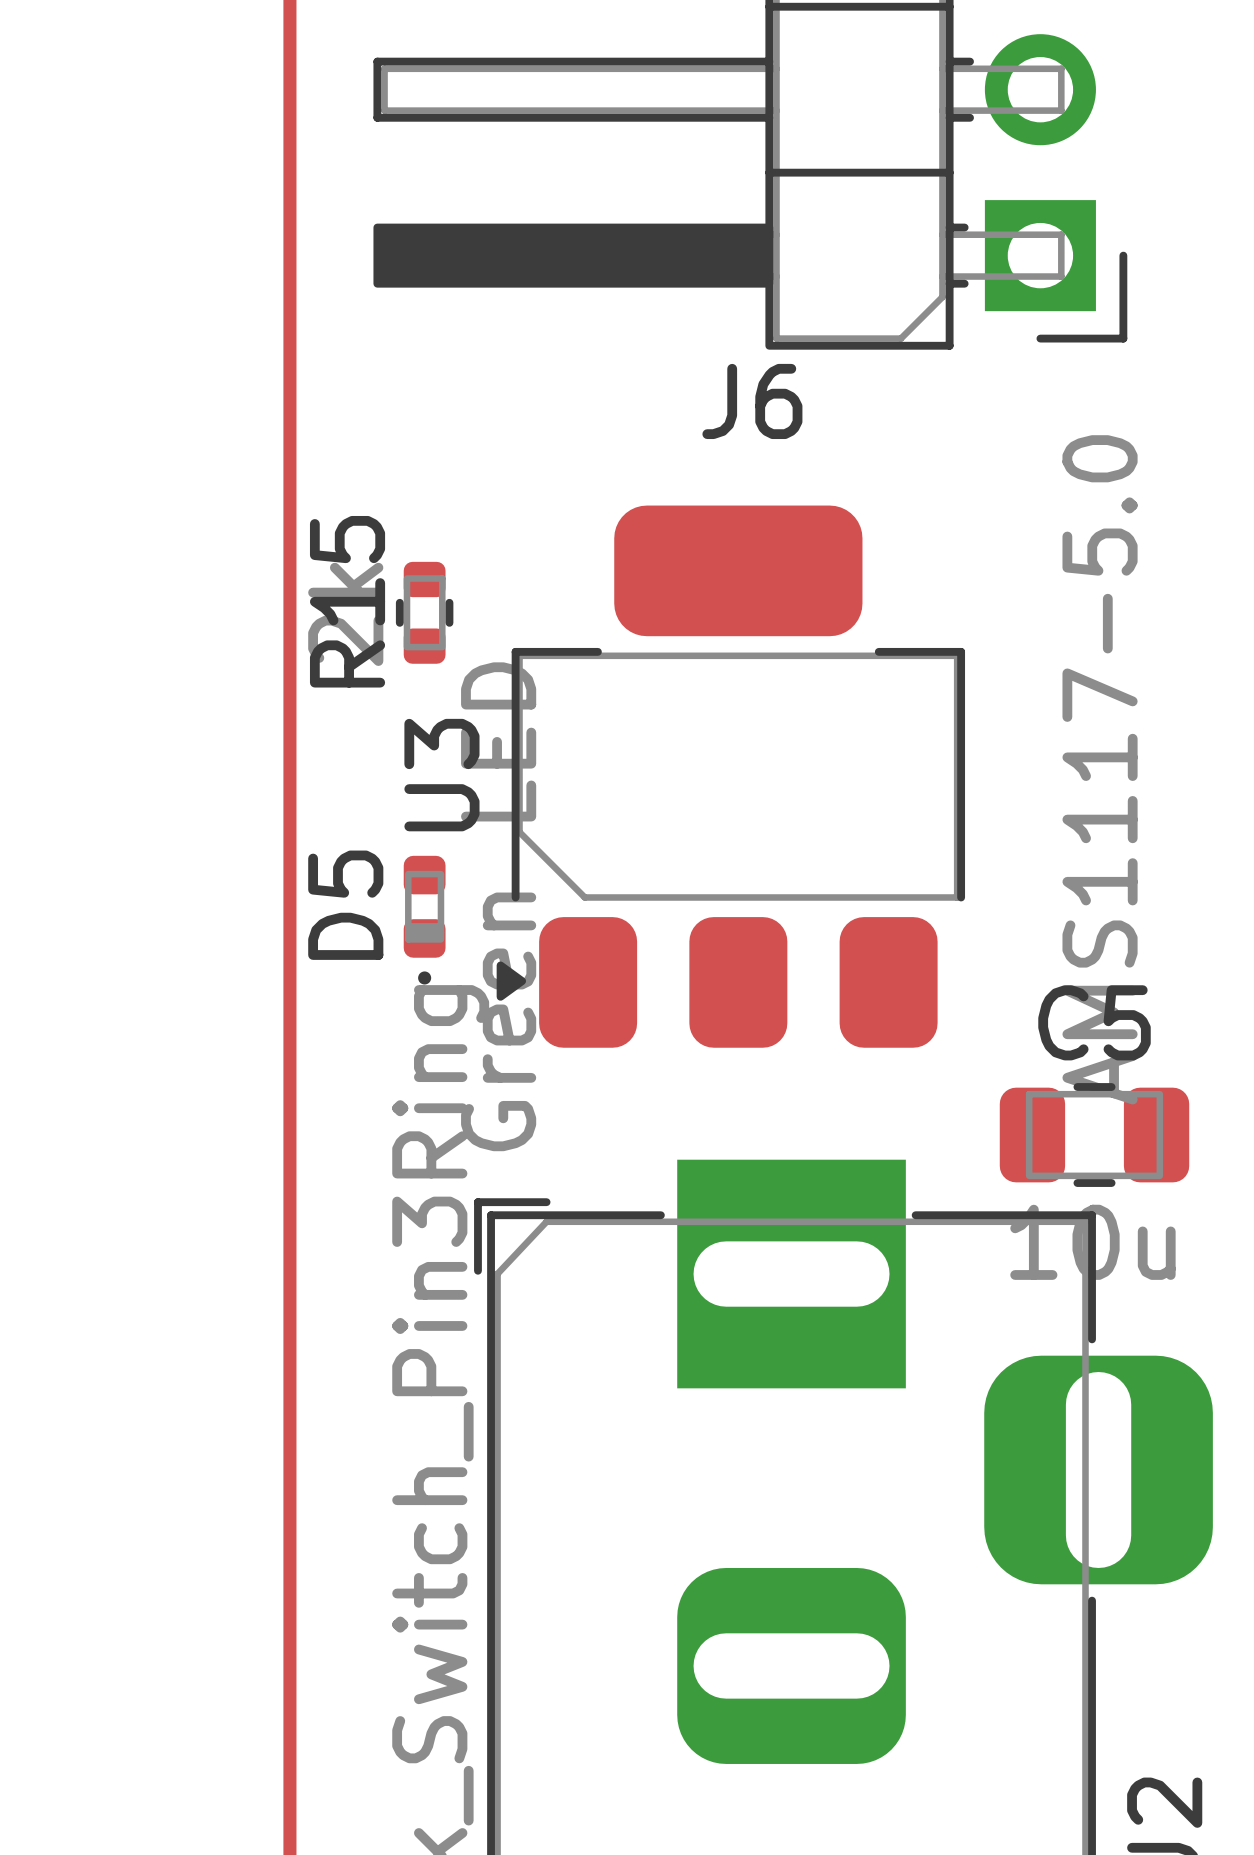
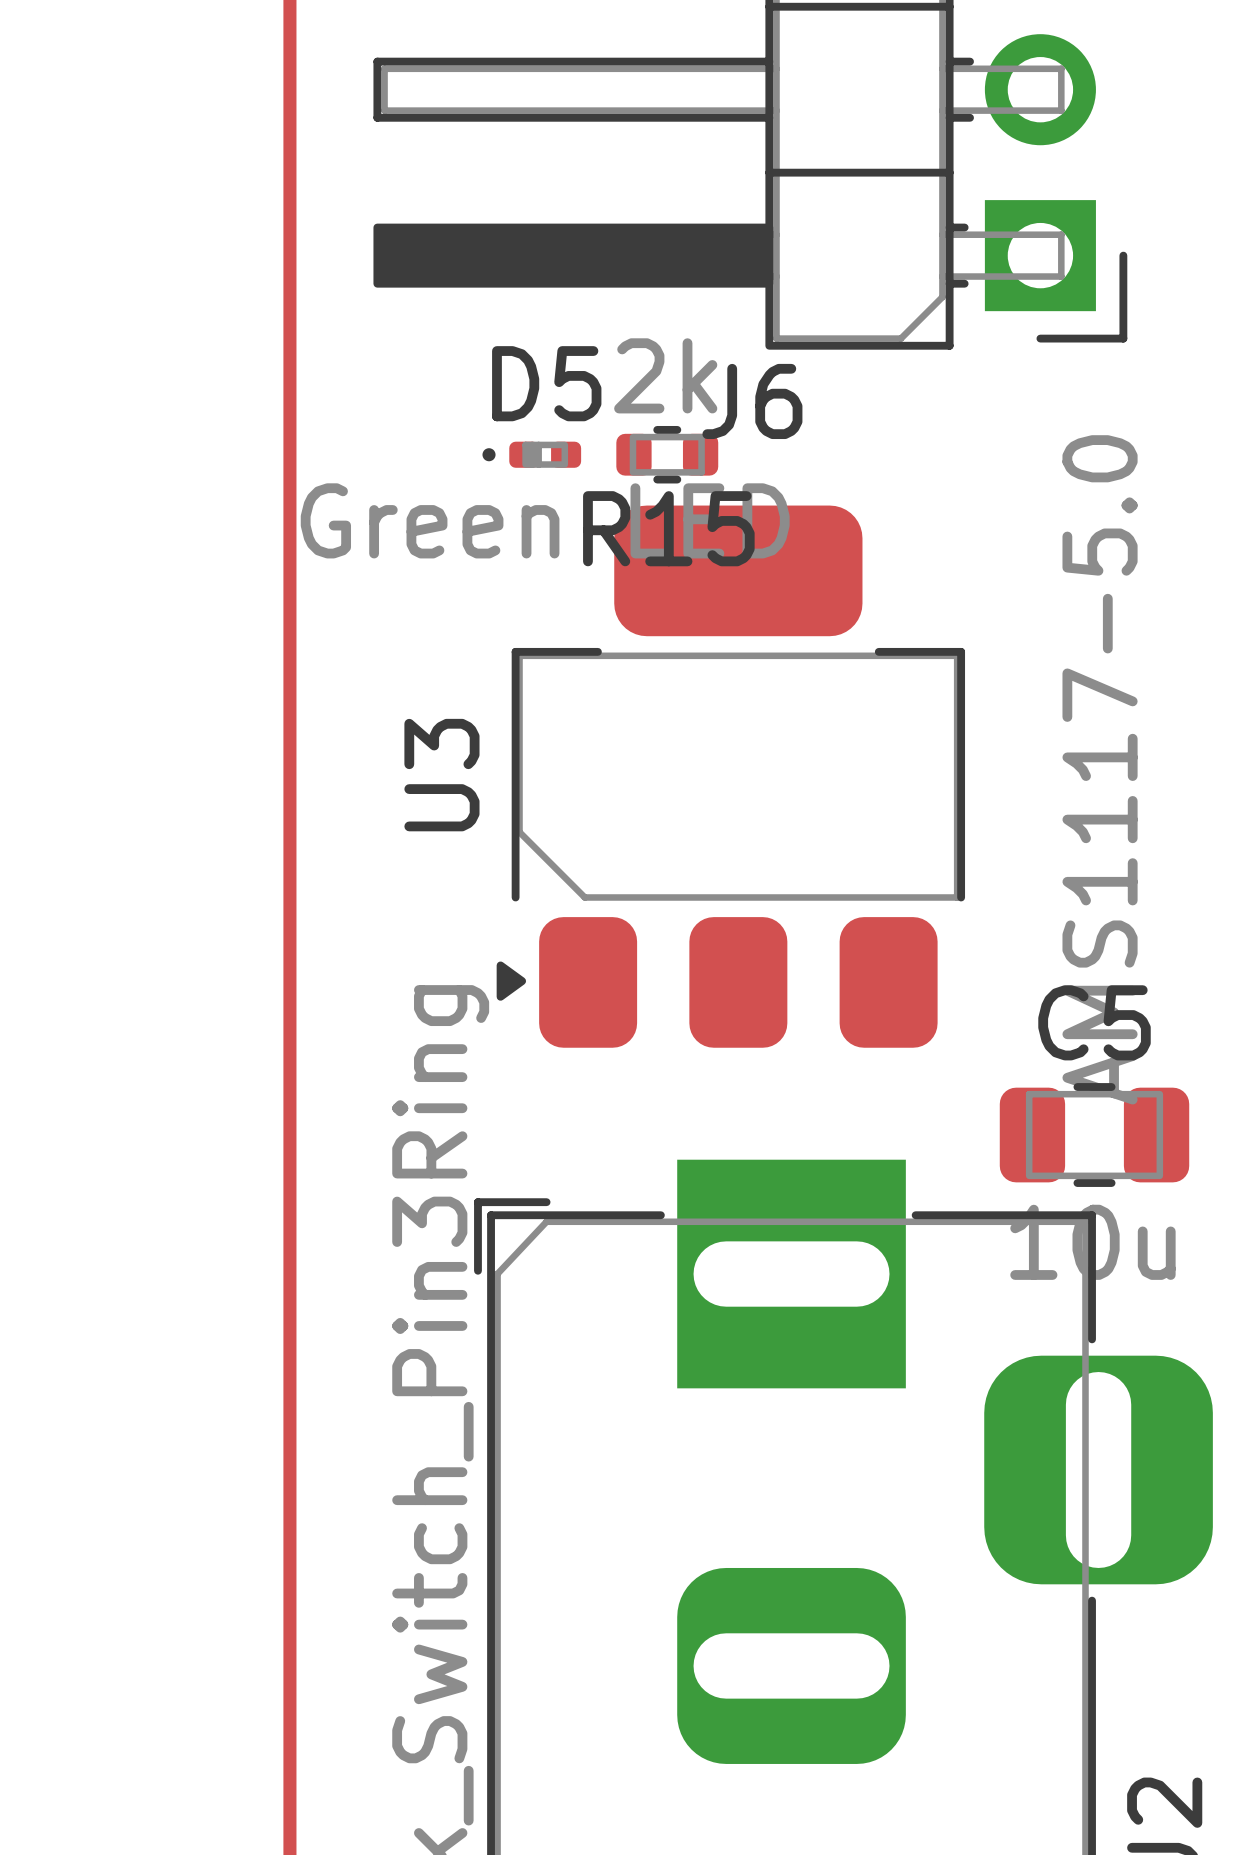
R15 rotation: 0° (424, 612) -> 90° clockwise (667, 454)
R15 position: (424, 612) -> (667, 454)
D5 footprint: [403, 855, 446, 985] -> [482, 441, 582, 468]

